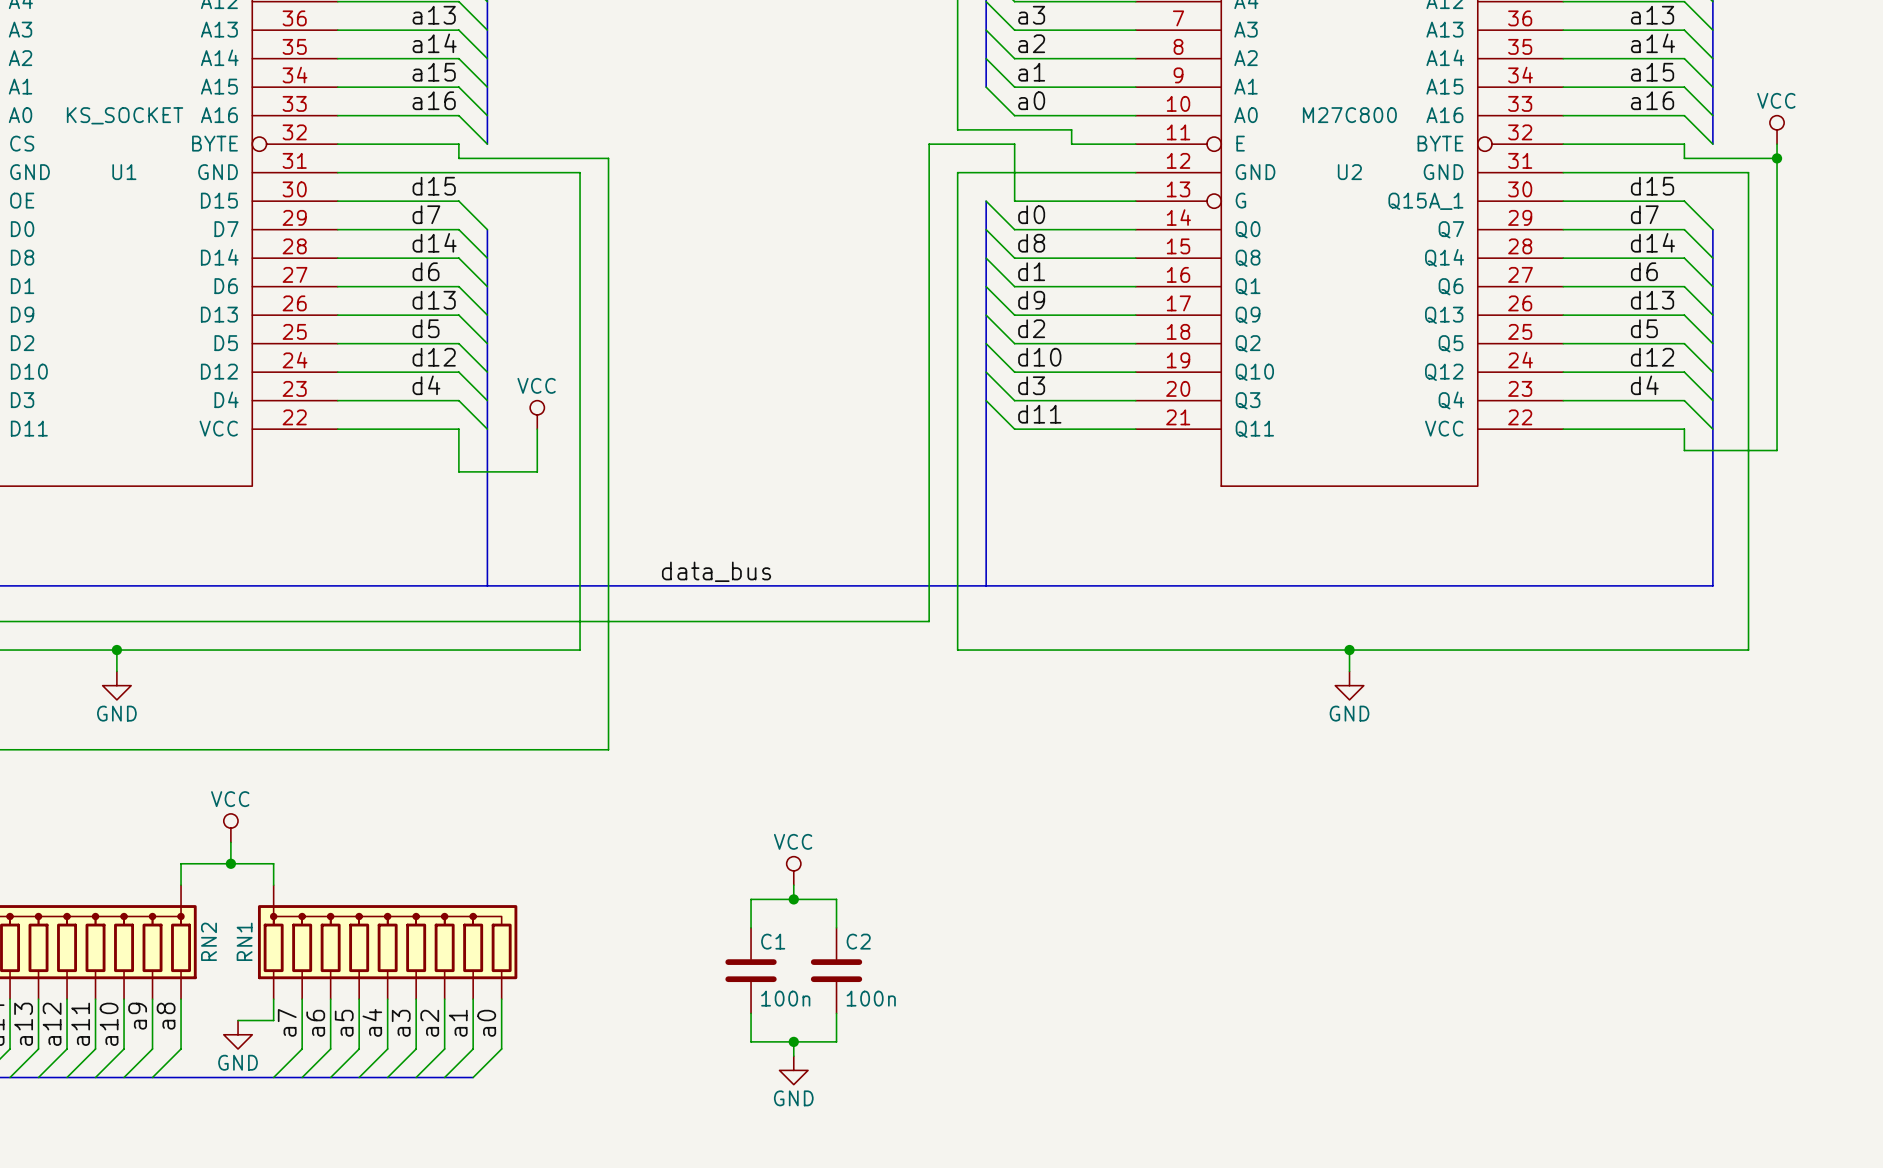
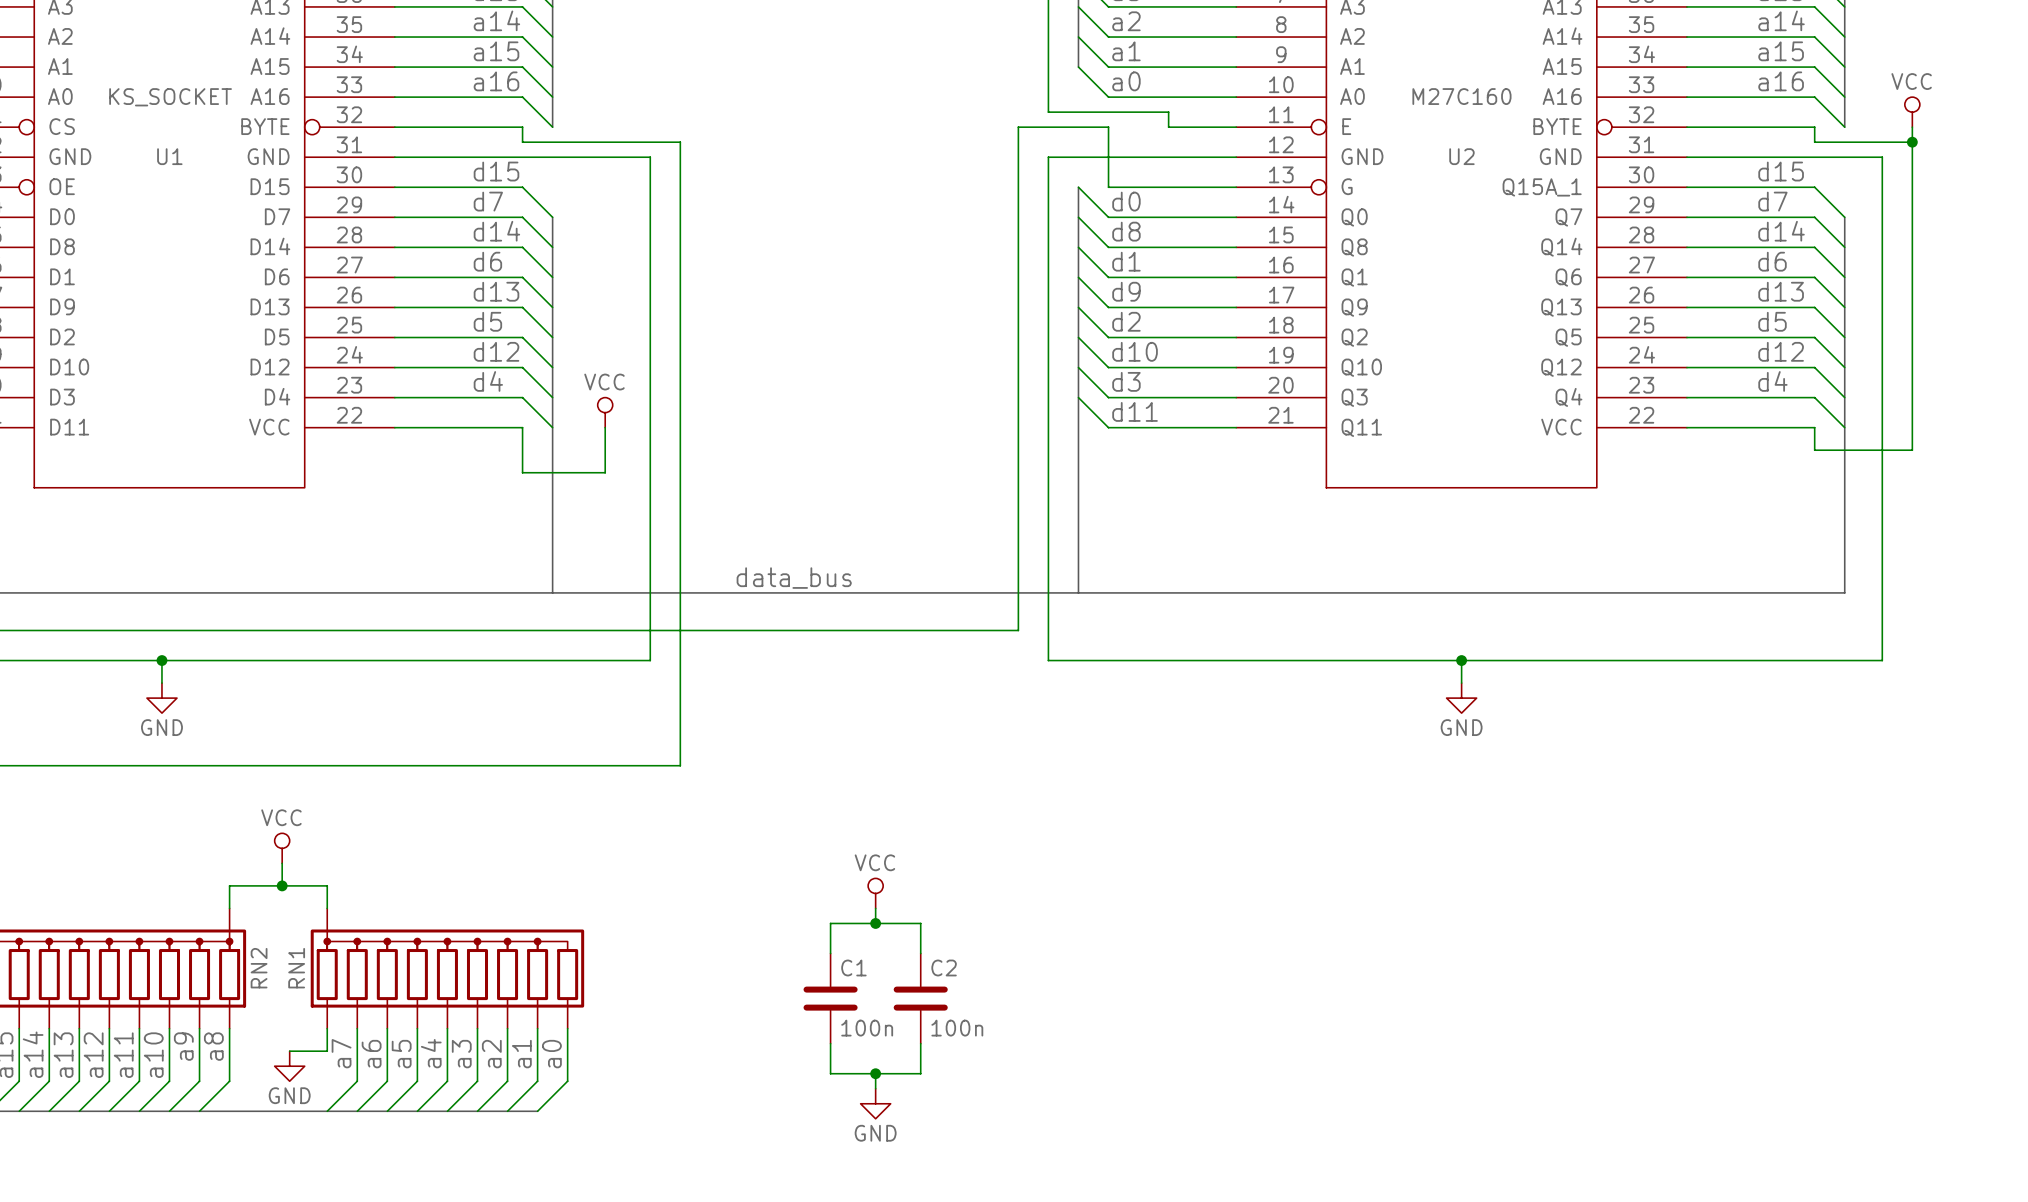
U2 value: M27C800 (1349, 115) -> M27C160 (1461, 96)

